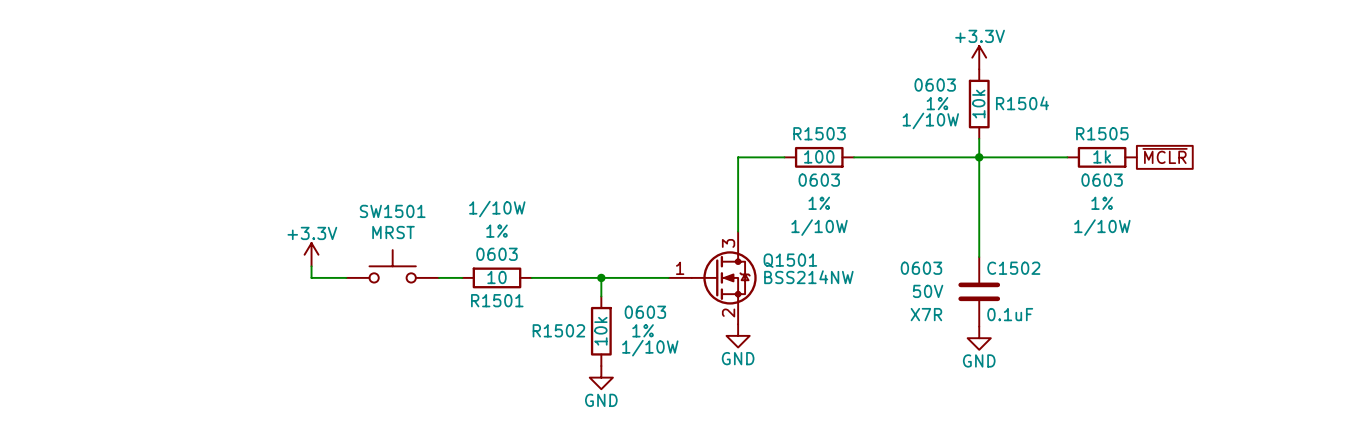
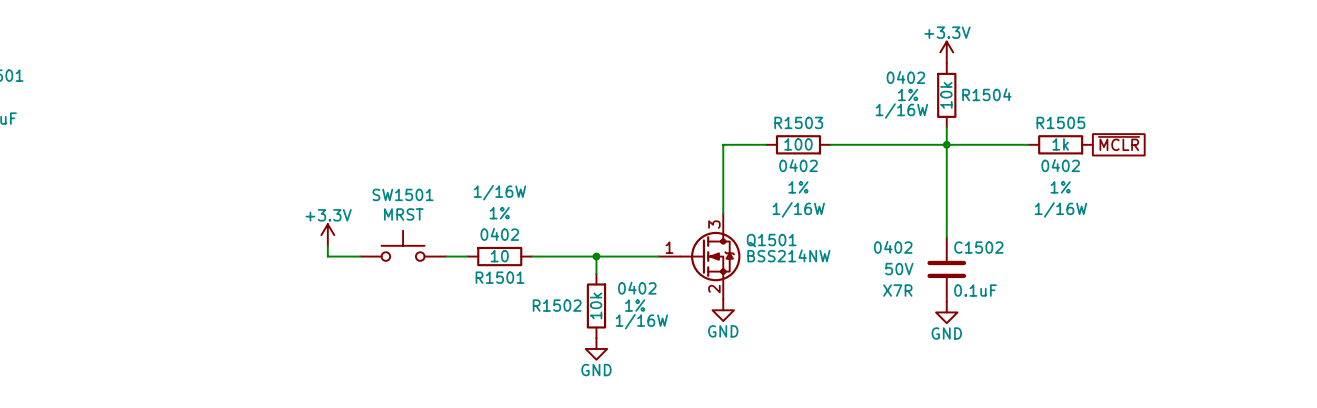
R1504 text: 0603 (935, 85) -> 0402 (905, 77)
R1504 text: 1/10W (930, 120) -> 1/16W (901, 111)
R1503 text: 0603 (819, 180) -> 0402 (798, 165)
R1505 text: 0603 (1102, 180) -> 0402 (1060, 165)
R1501 text: 1/10W (497, 209) -> 1/16W (500, 192)
R1503 text: 1/10W (819, 227) -> 1/16W (798, 209)
R1505 text: 1/10W (1102, 227) -> 1/16W (1060, 209)
R1501 text: 0603 (497, 254) -> 0402 (499, 234)
C1502 text: 0603 (921, 268) -> 0402 (893, 247)
R1502 text: 0603 (645, 312) -> 0402 (637, 288)
R1502 text: 1/10W (650, 348) -> 1/16W (641, 321)

